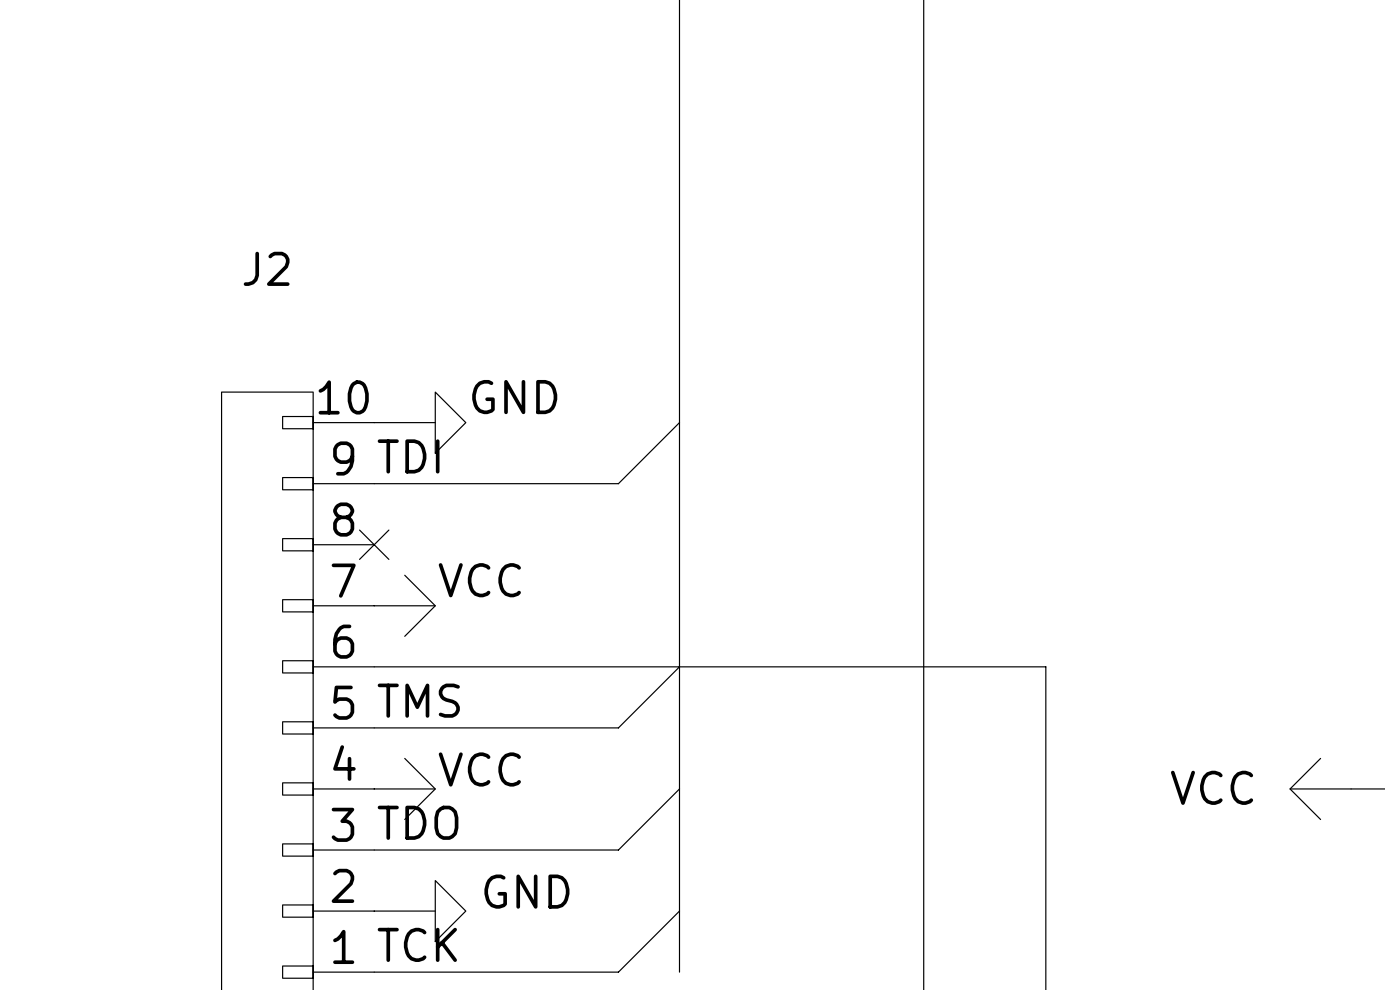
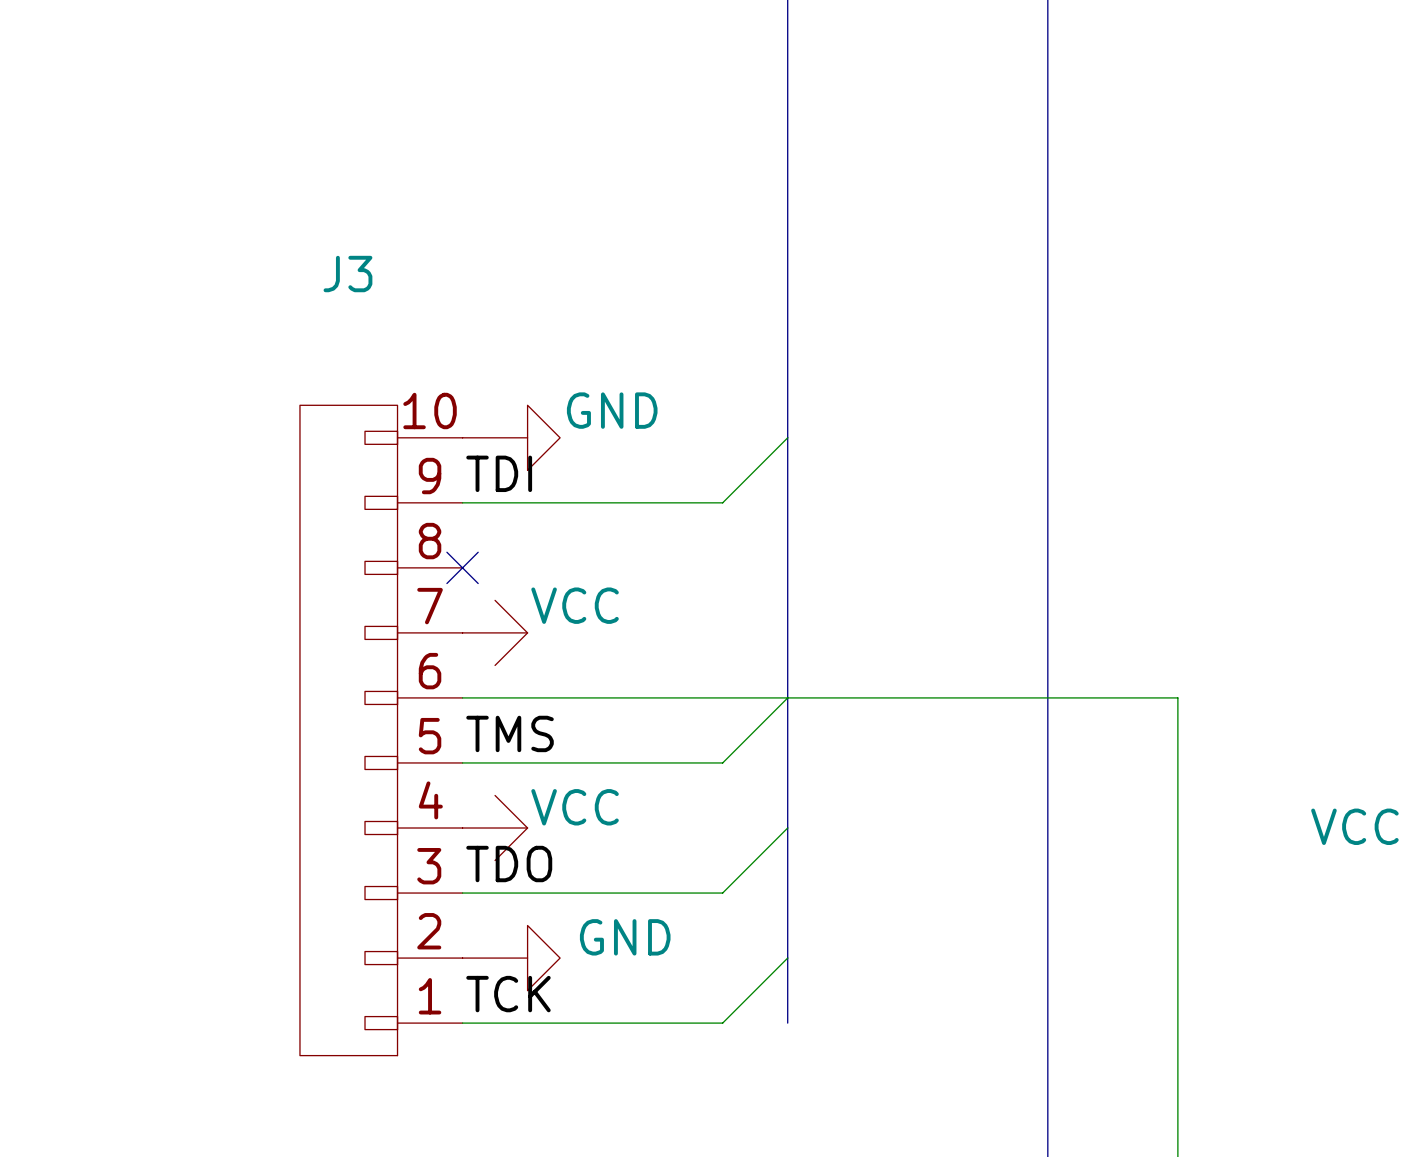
J2 name: J2 (266, 268) -> J3 (347, 274)

